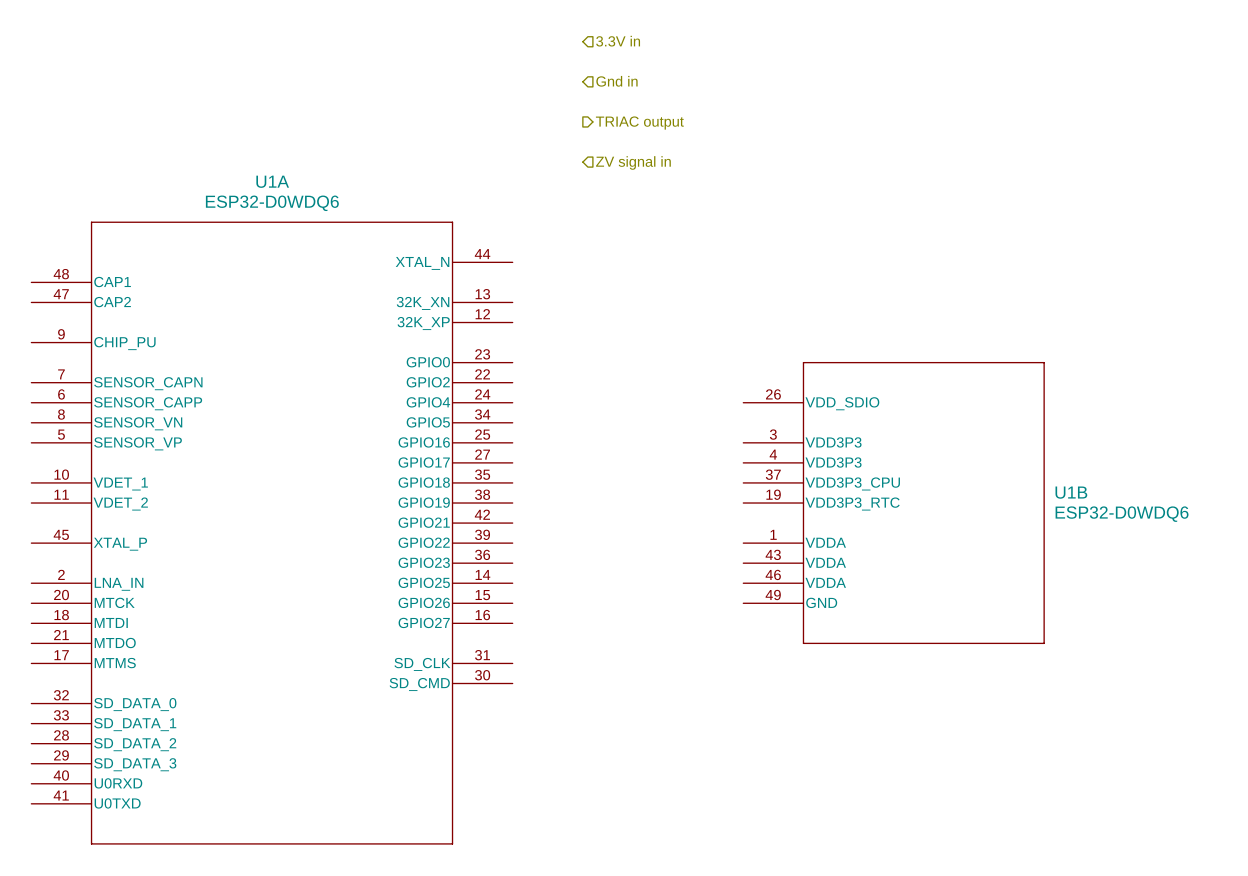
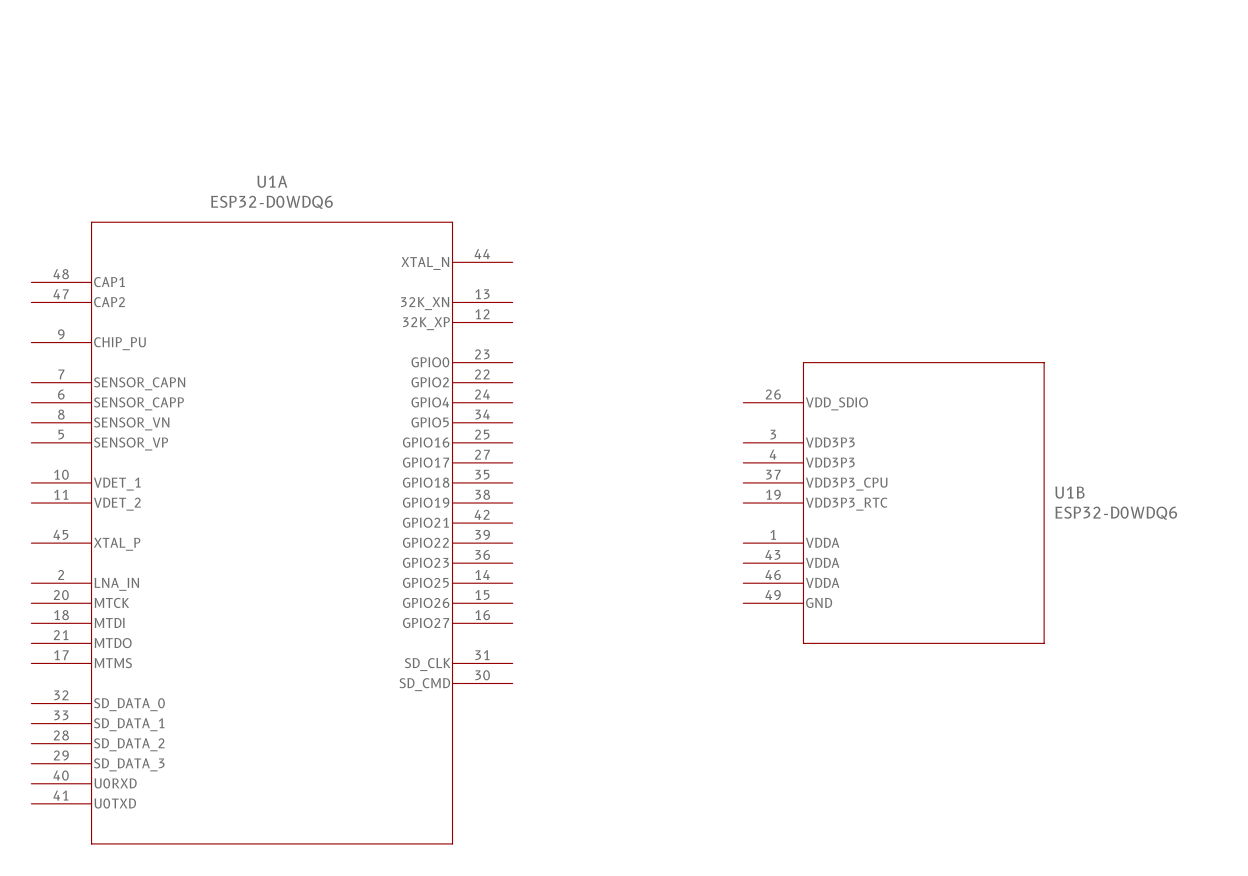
hierarchical label: 3.3V in (618, 41) -> none
hierarchical label: Gnd in (616, 81) -> none
hierarchical label: TRIAC output (639, 123) -> none
hierarchical label: ZV signal in (633, 162) -> none

